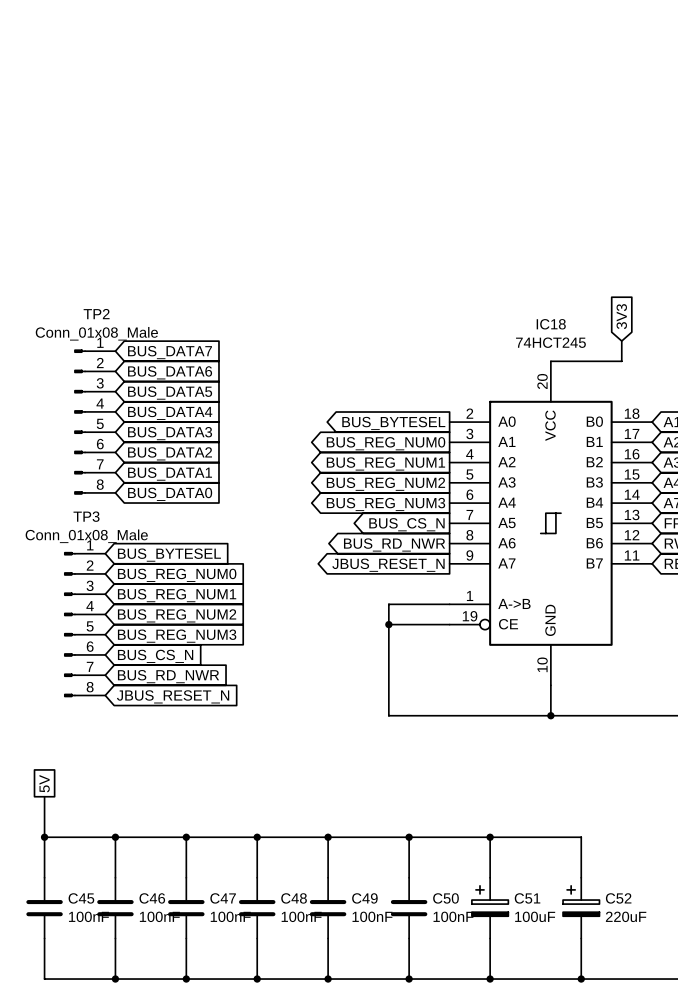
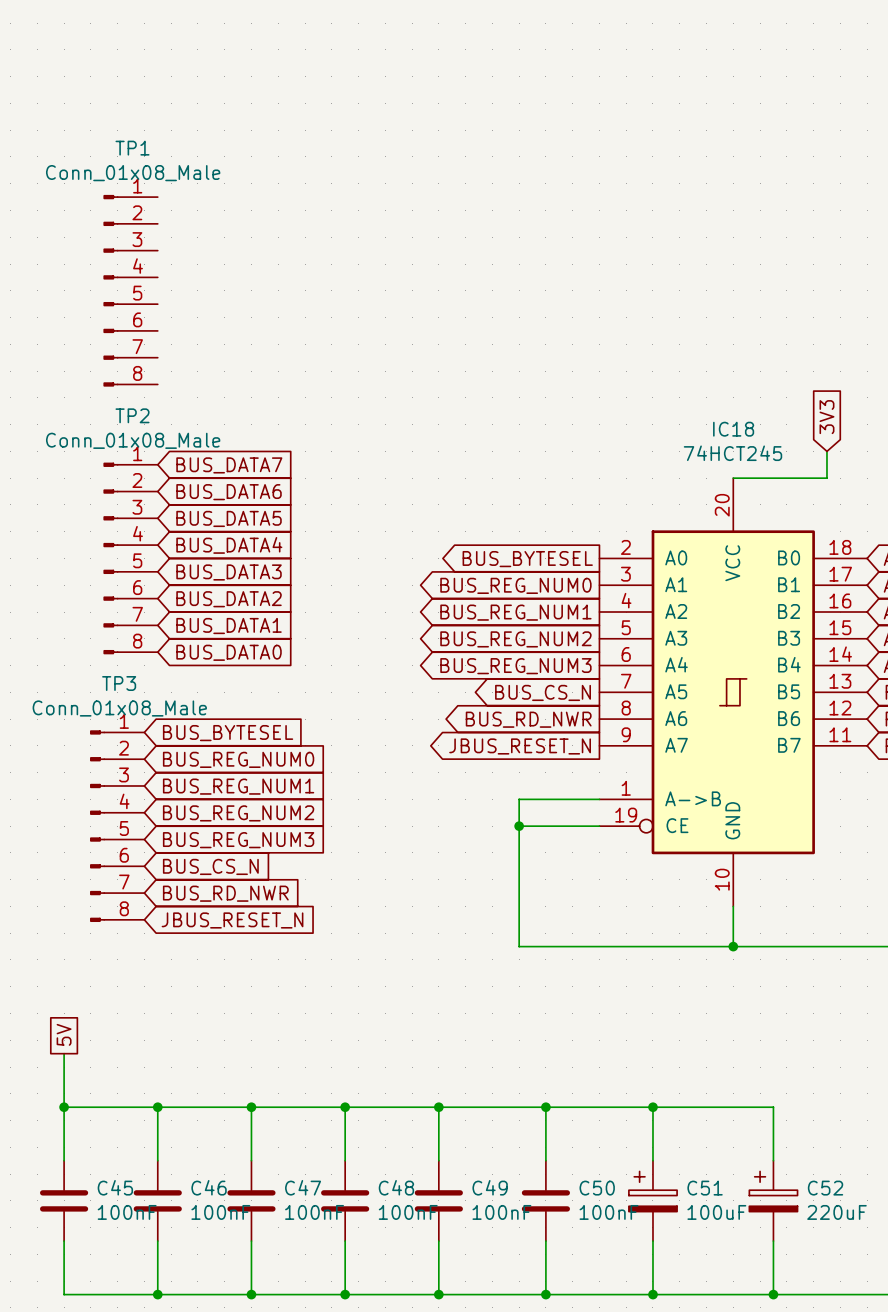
TP1: none -> Conn_01x08_Male (130, 290)

